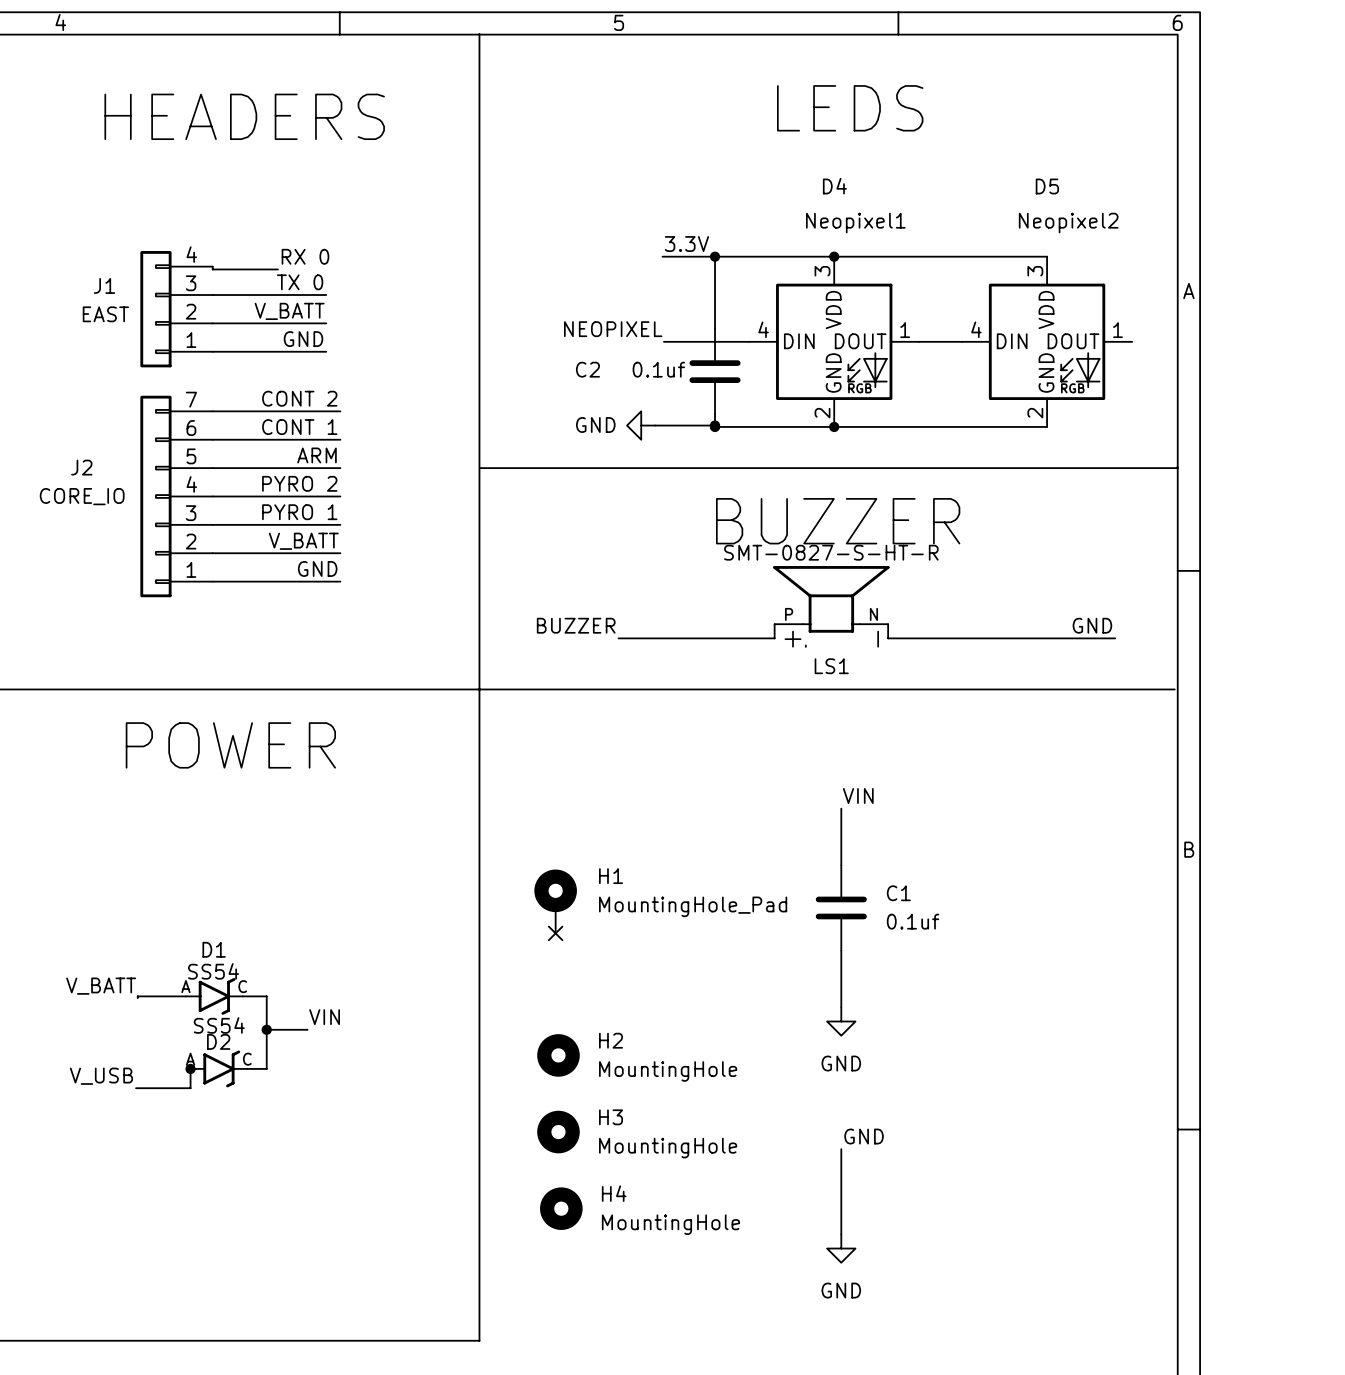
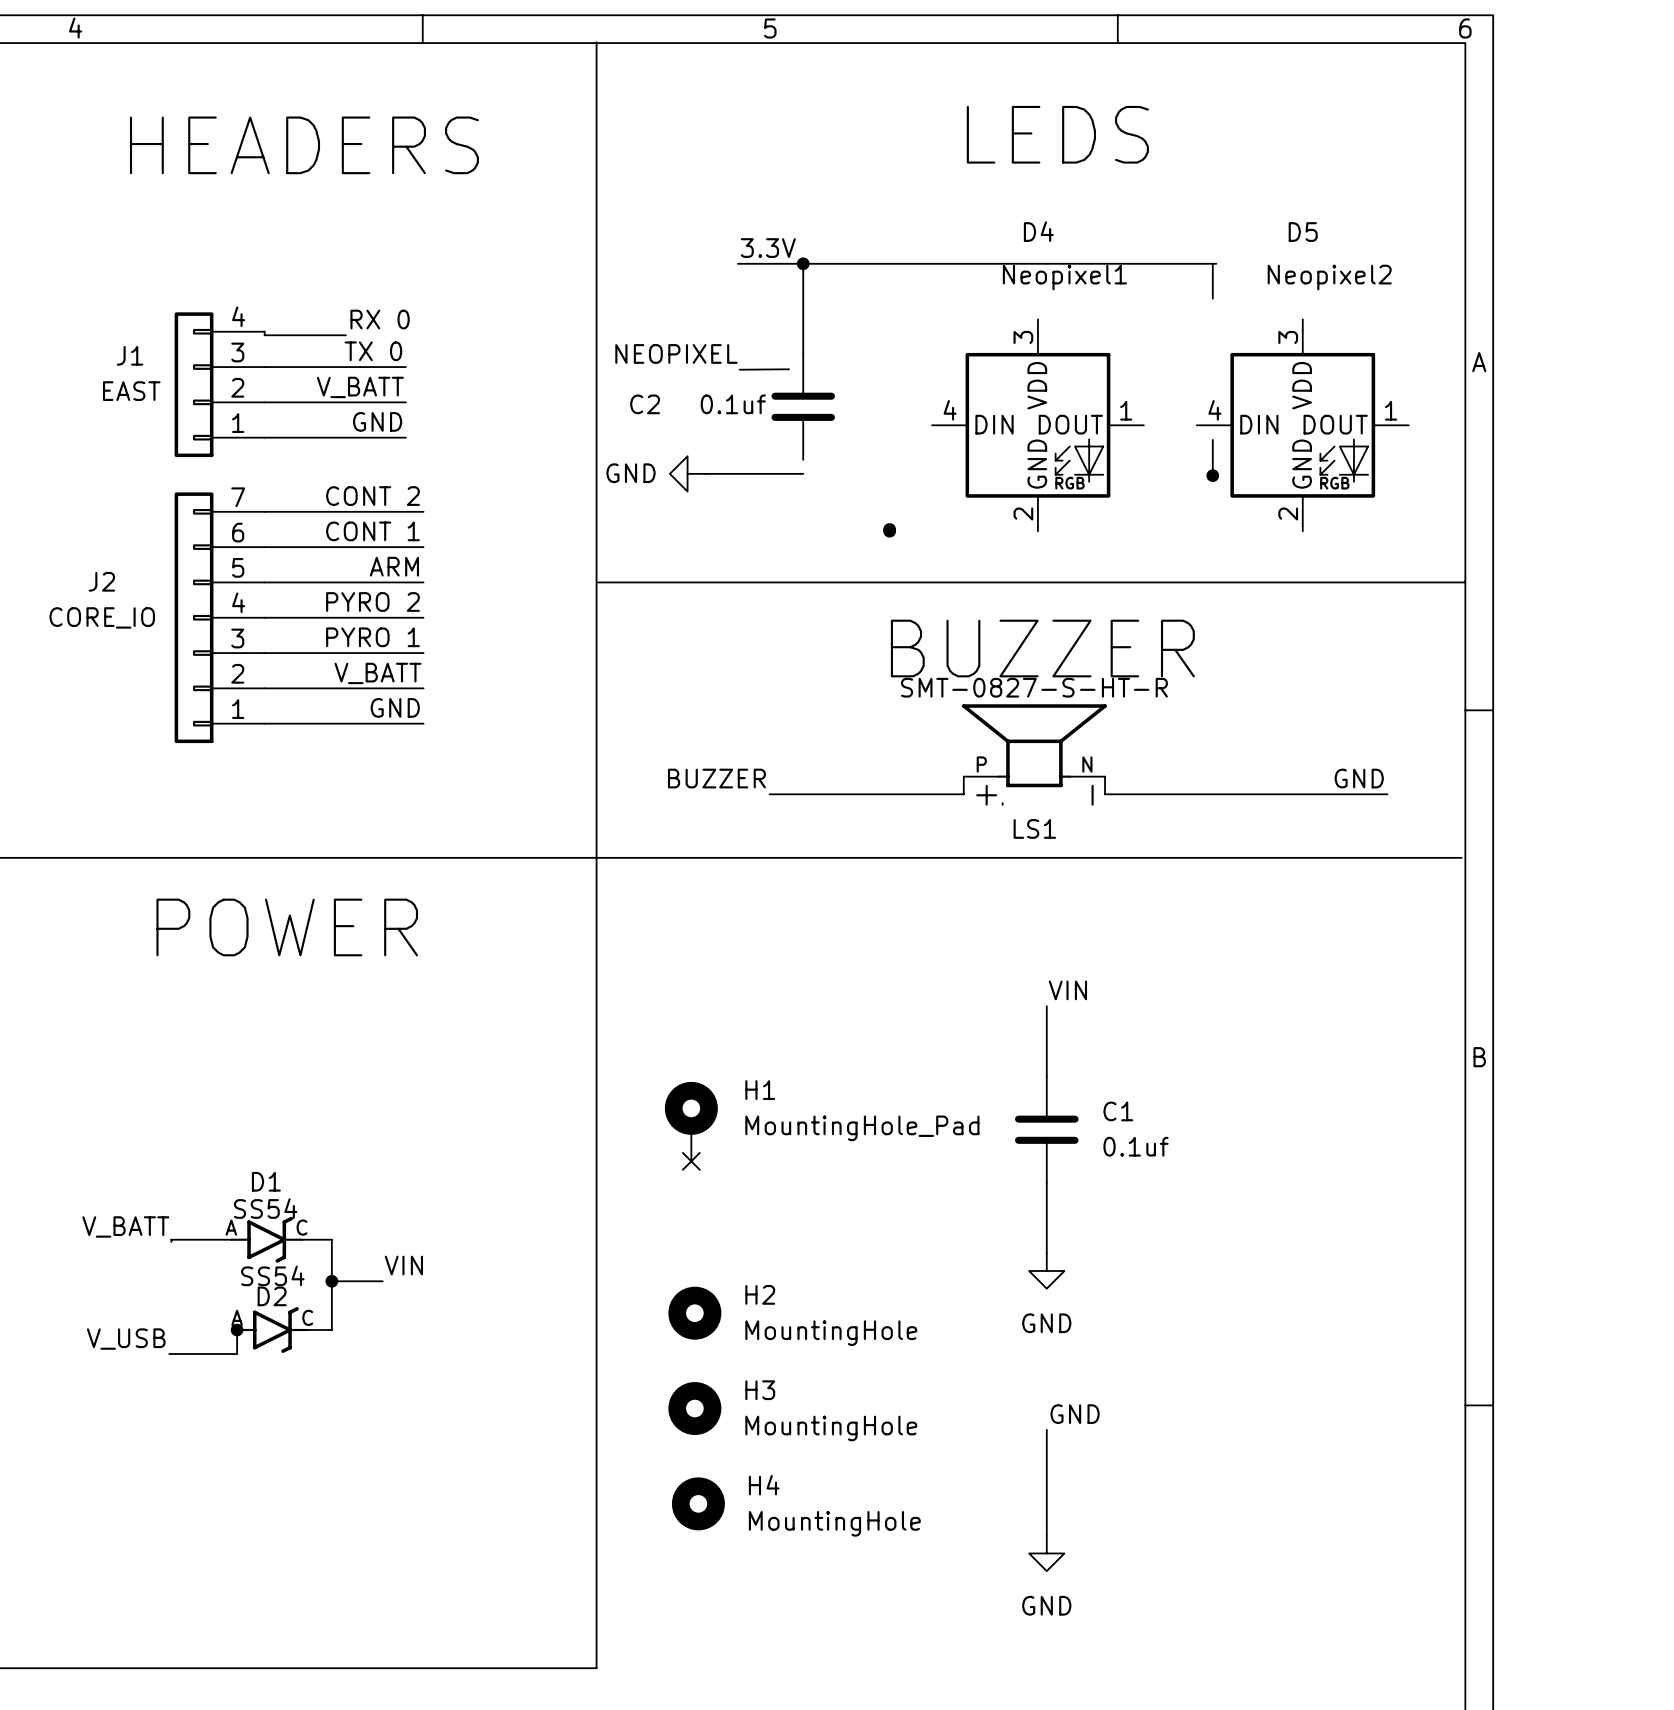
junction: none -> (803, 263)
wire: none -> (1212, 263) (1212, 298)
label position: 3.3V (686, 244) -> 3.3V (768, 248)
wire: (662, 256) (1047, 256) -> (737, 263) (1216, 263)
wire: (715, 256) (715, 329) -> (803, 263) (803, 353)
junction: (715, 256) -> none
junction: (834, 256) -> none
wire: none -> (789, 369) (739, 369)
label position: NEOPIXEL (613, 329) -> NEOPIXEL (676, 353)
wire: (663, 341) (749, 341) -> none
wire: (919, 341) (961, 341) -> none
wire: none -> (1212, 439) (1212, 475)
C2 position: (715, 371) -> (803, 406)
wire: none -> (705, 473) (803, 473)
junction: none -> (1212, 475)
wire: (715, 414) (715, 426) (1047, 426) -> none
power symbol position: GND (641, 425) -> GND (687, 473)
wire: (655, 425) (715, 425) -> none
junction: (834, 426) -> none

